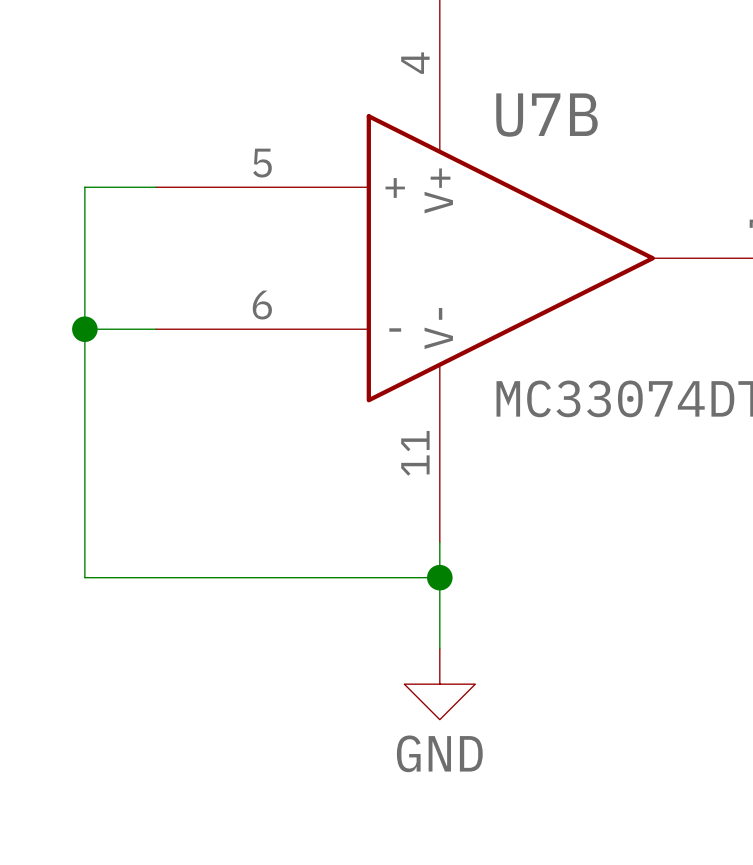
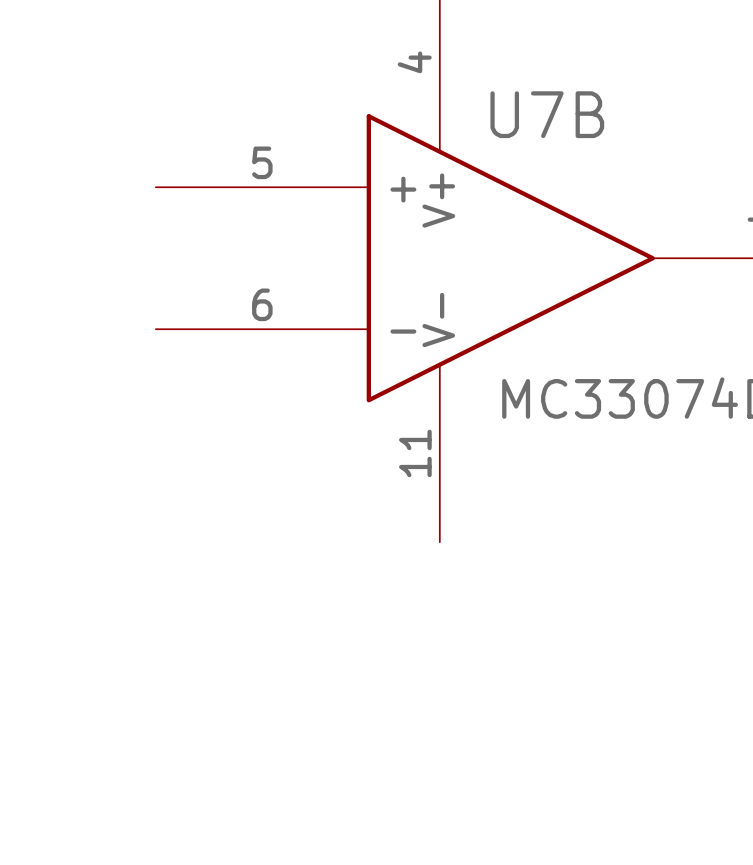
wire: (155, 187) (84, 187) (84, 577) (439, 577) -> none
wire: (84, 329) (155, 329) -> none
junction: (84, 329) -> none
wire: (439, 542) (439, 648) -> none
junction: (439, 577) -> none
power symbol: GND (439, 684) -> none

